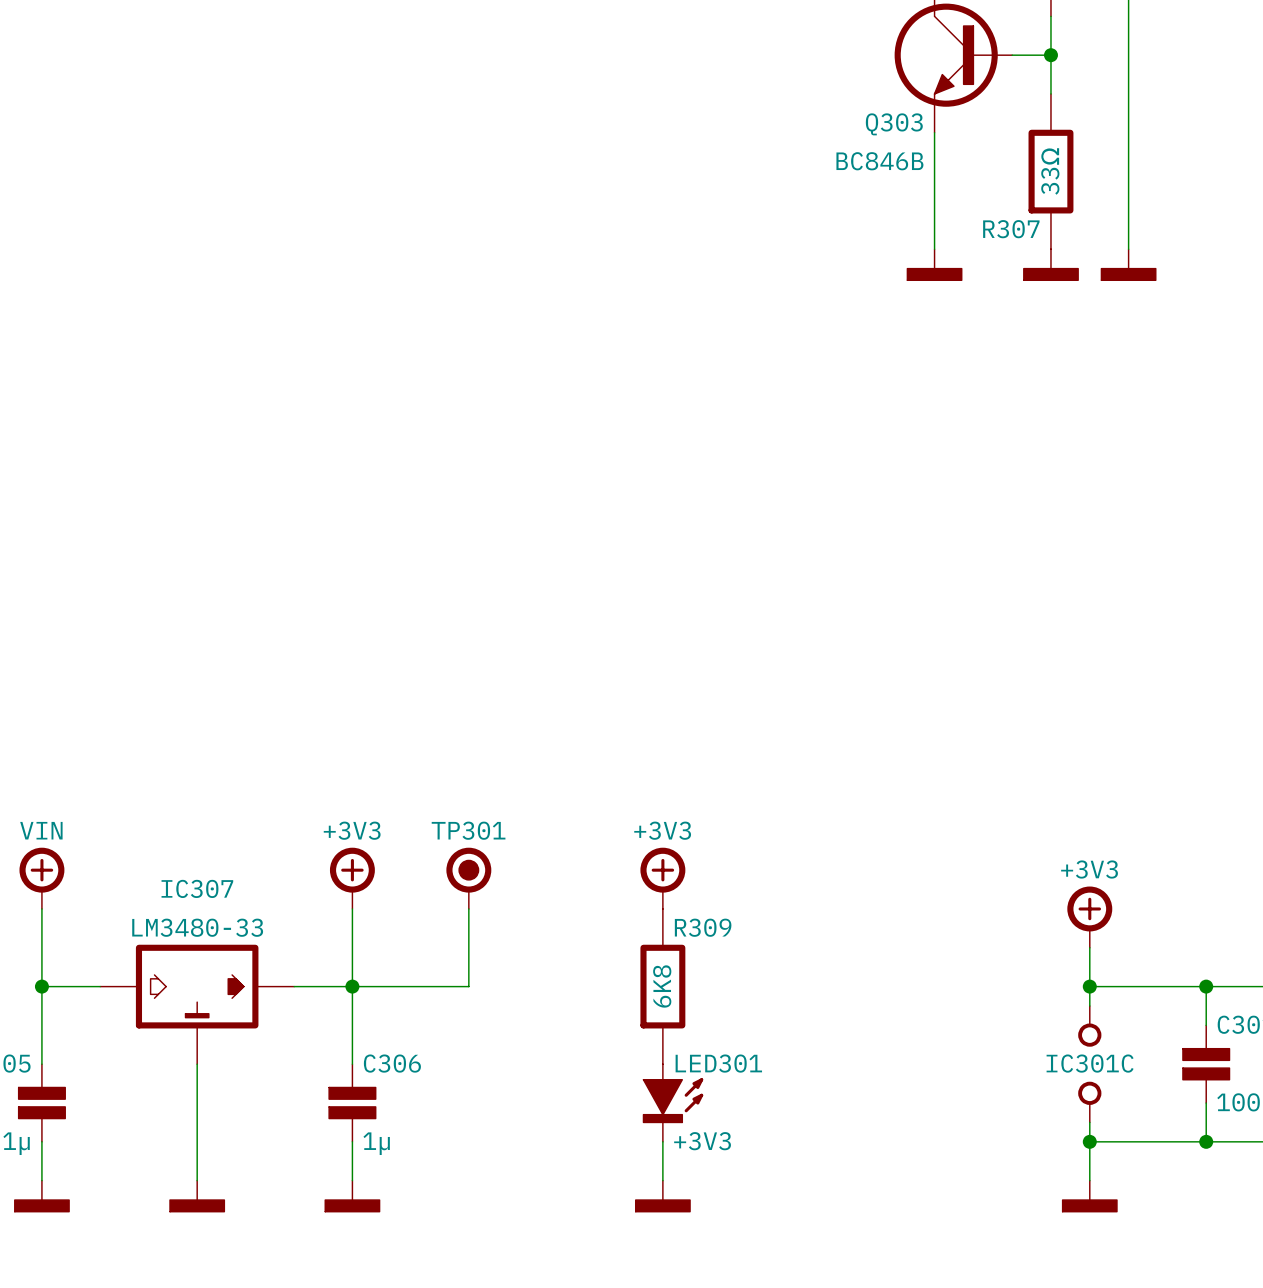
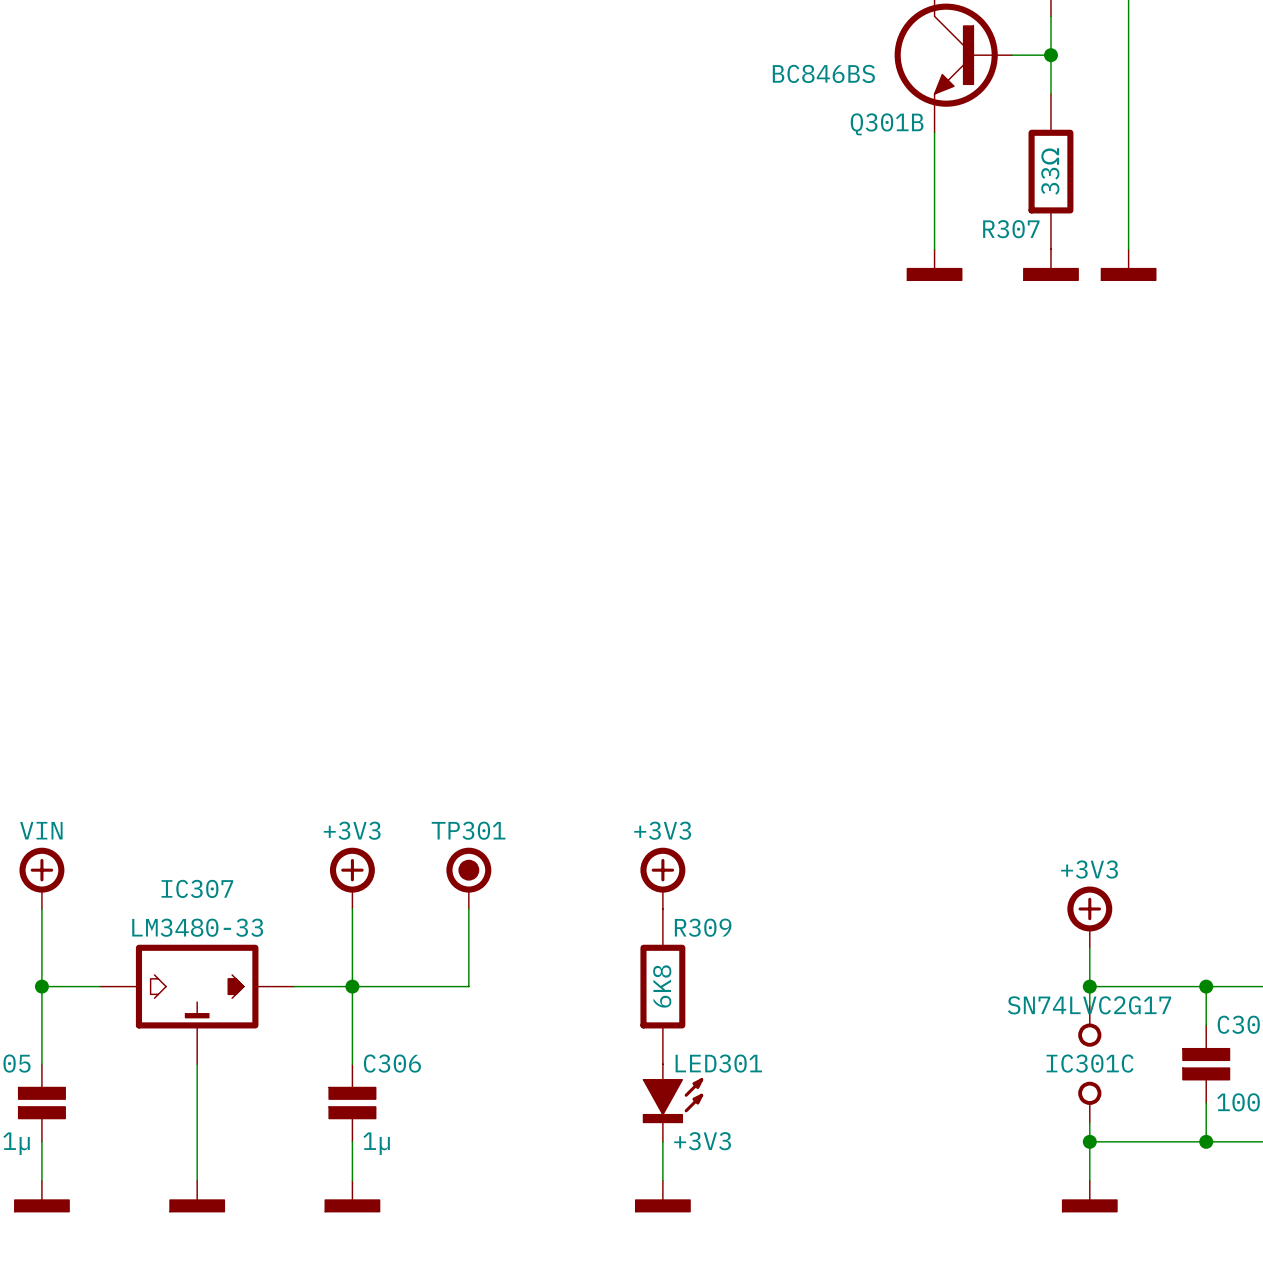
Q303 text: none -> BC846BS (823, 73)
Q303 name: Q303 (894, 124) -> Q301B (887, 124)
Q303 value: BC846B (879, 161) -> none
IC301C text: none -> SN74LVC2G17 (1089, 1005)

